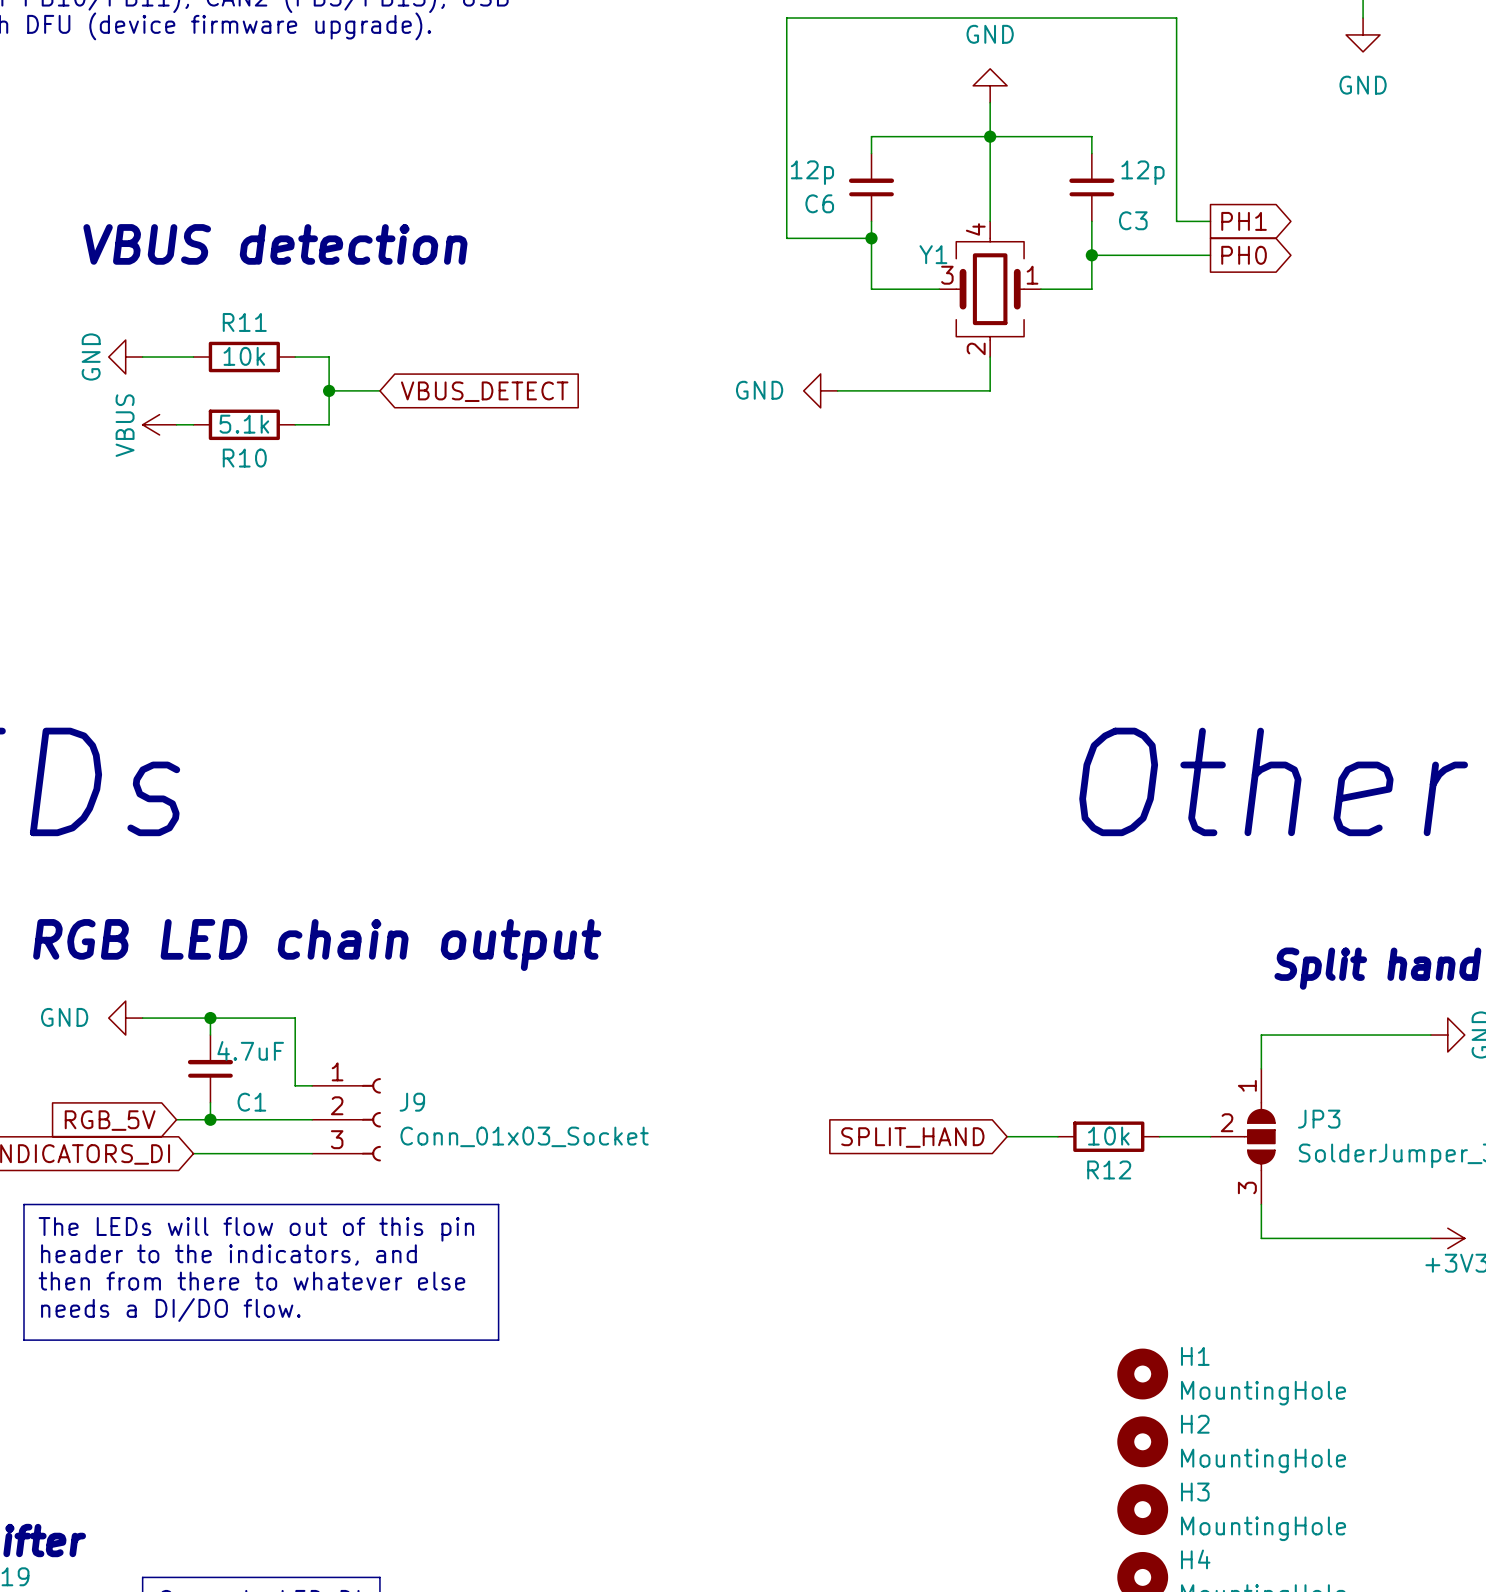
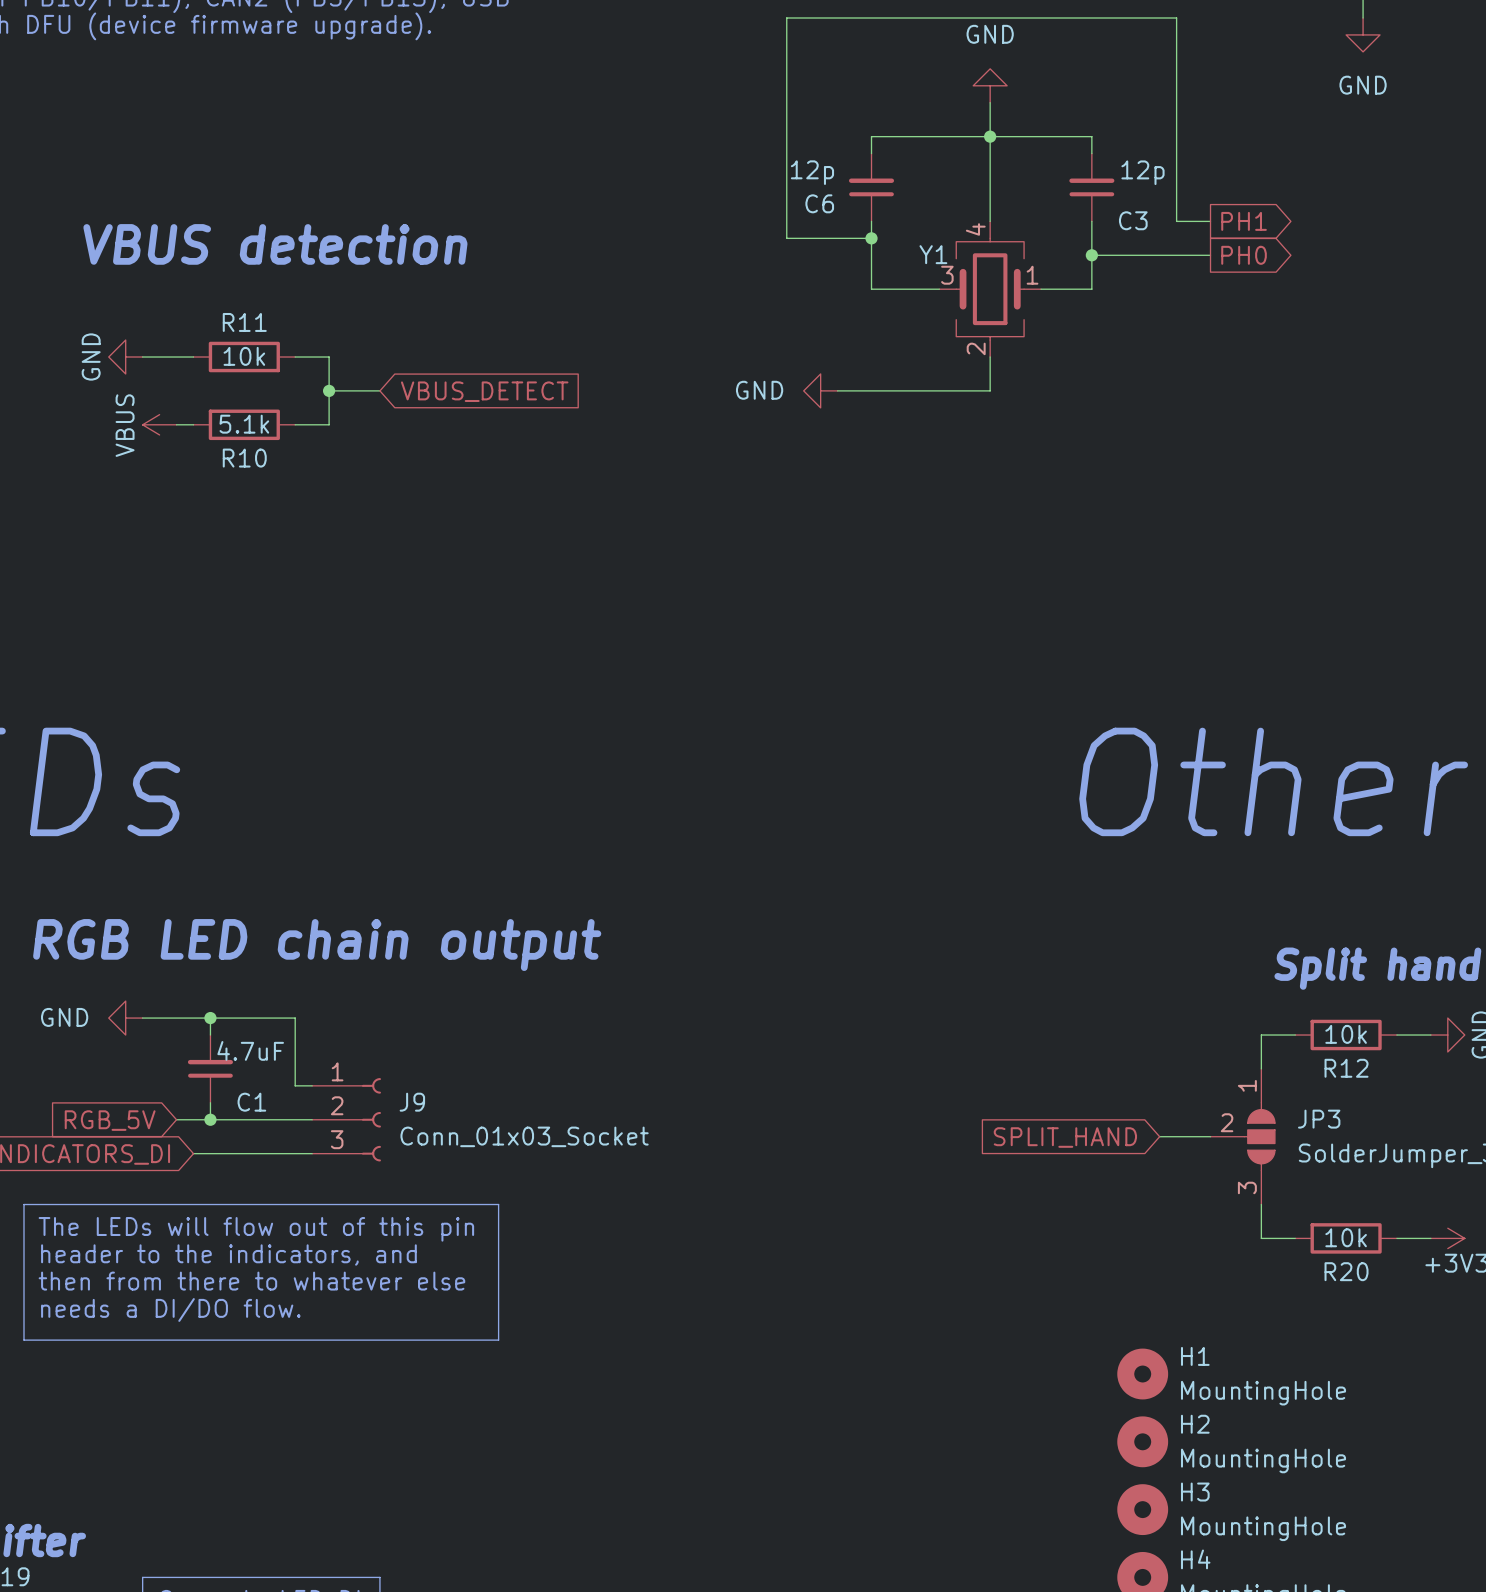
wire: (1295, 1035) (1396, 1035) -> none
wire: (1007, 1136) (1057, 1136) -> none
R12 position: (1108, 1136) -> (1346, 1035)
global label position: SPLIT_HAND (912, 1137) -> SPLIT_HAND (1065, 1137)
wire: (1295, 1238) (1396, 1238) -> none
R20: none -> 10k (1346, 1238)

